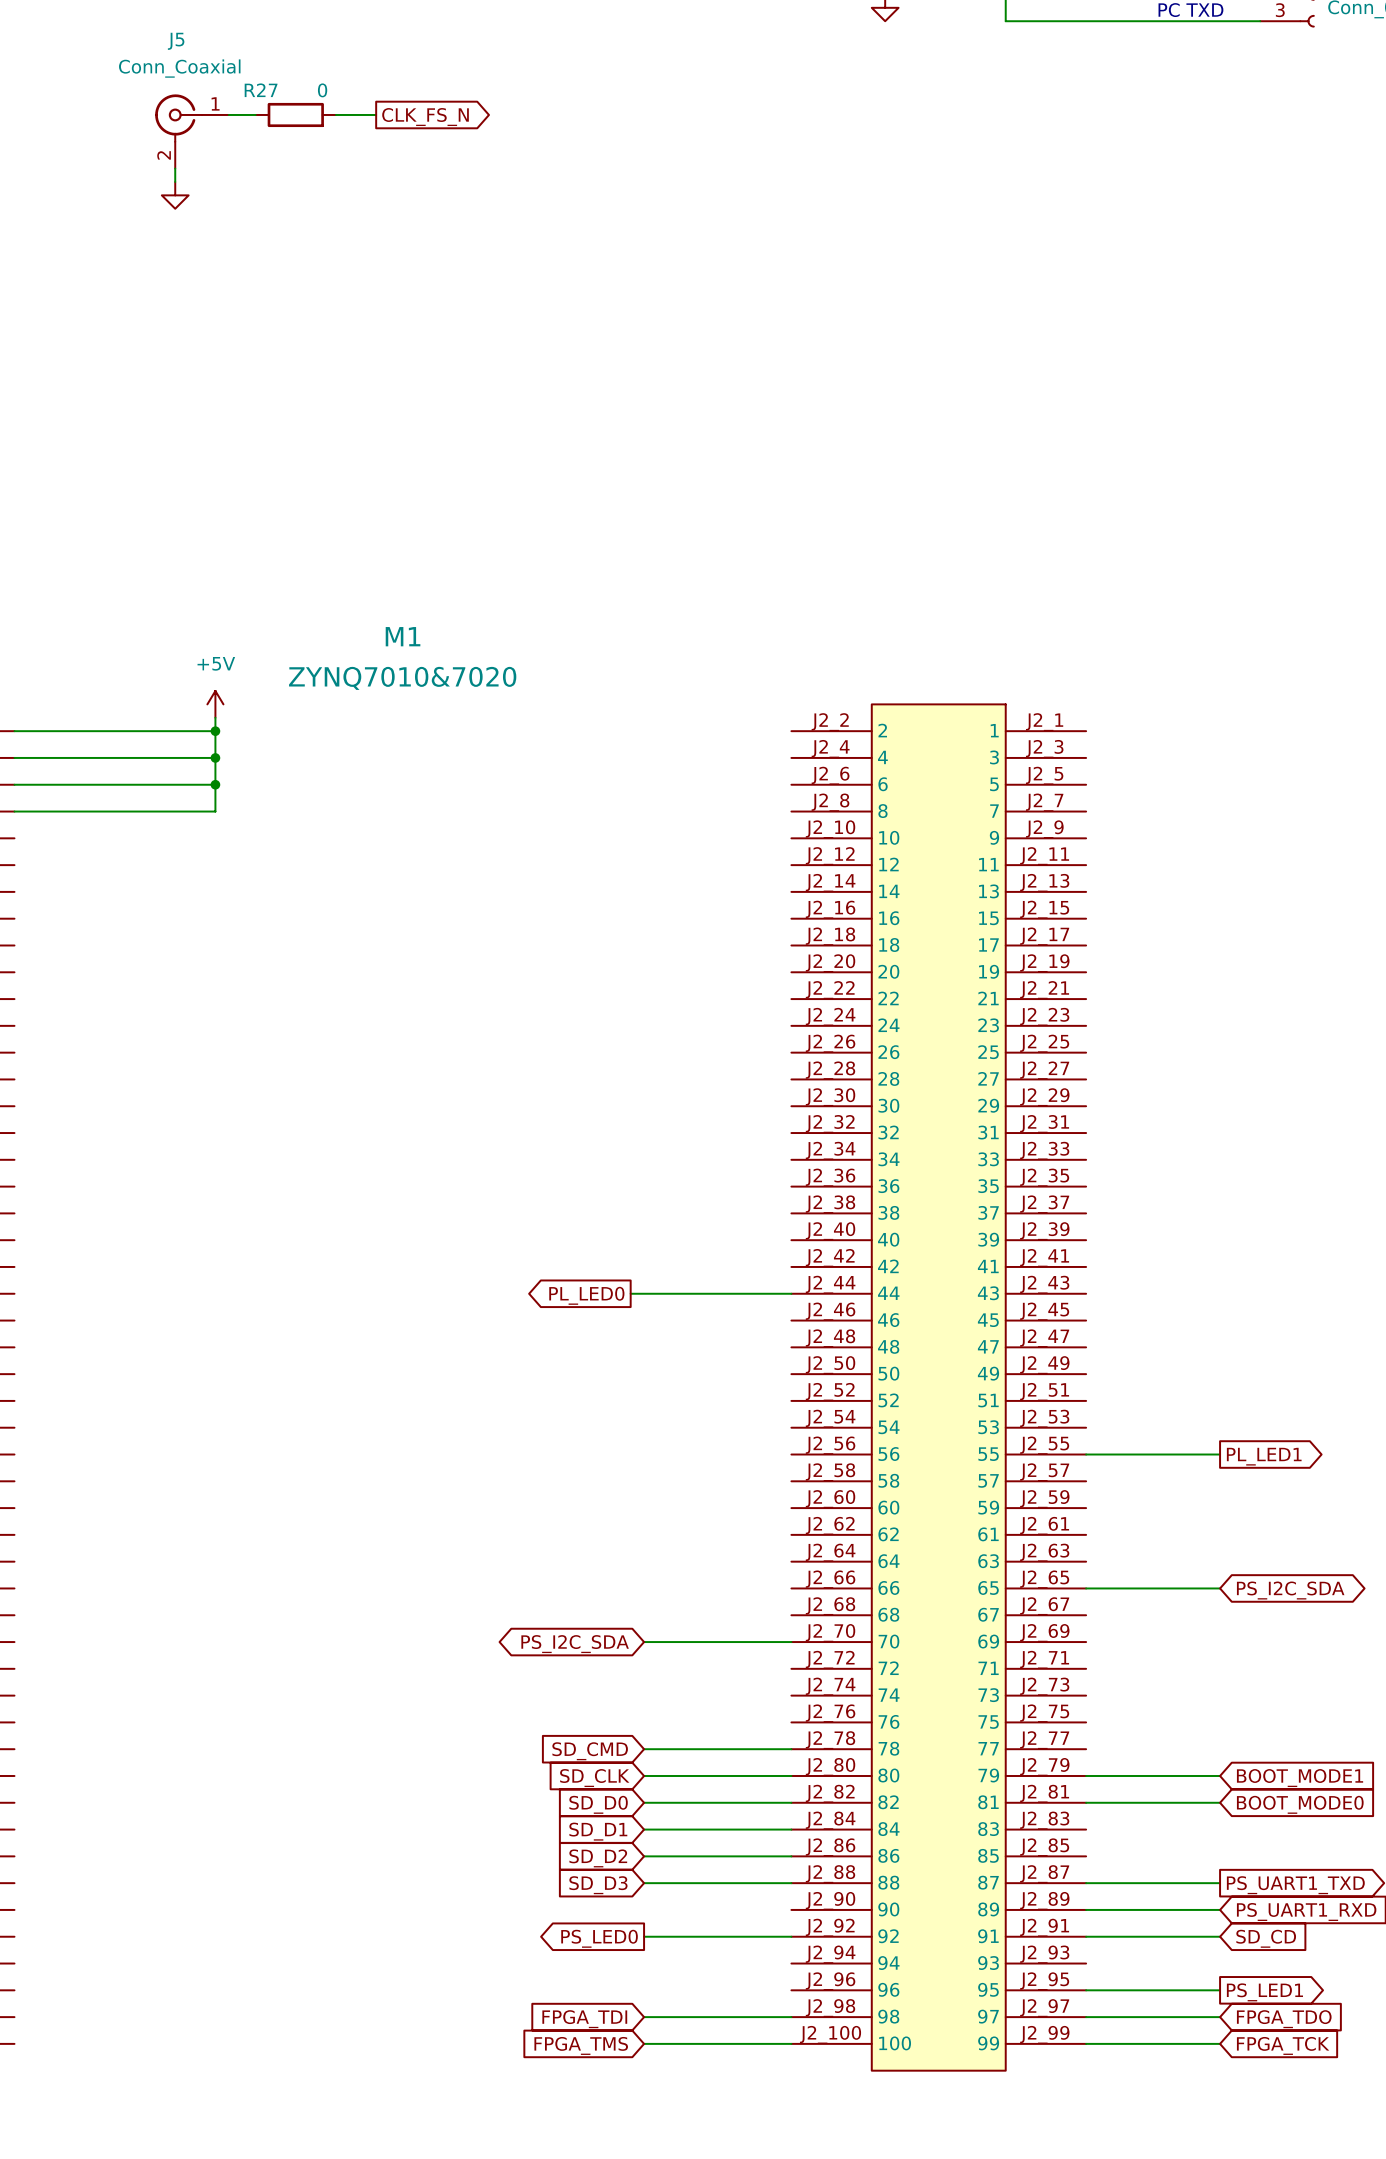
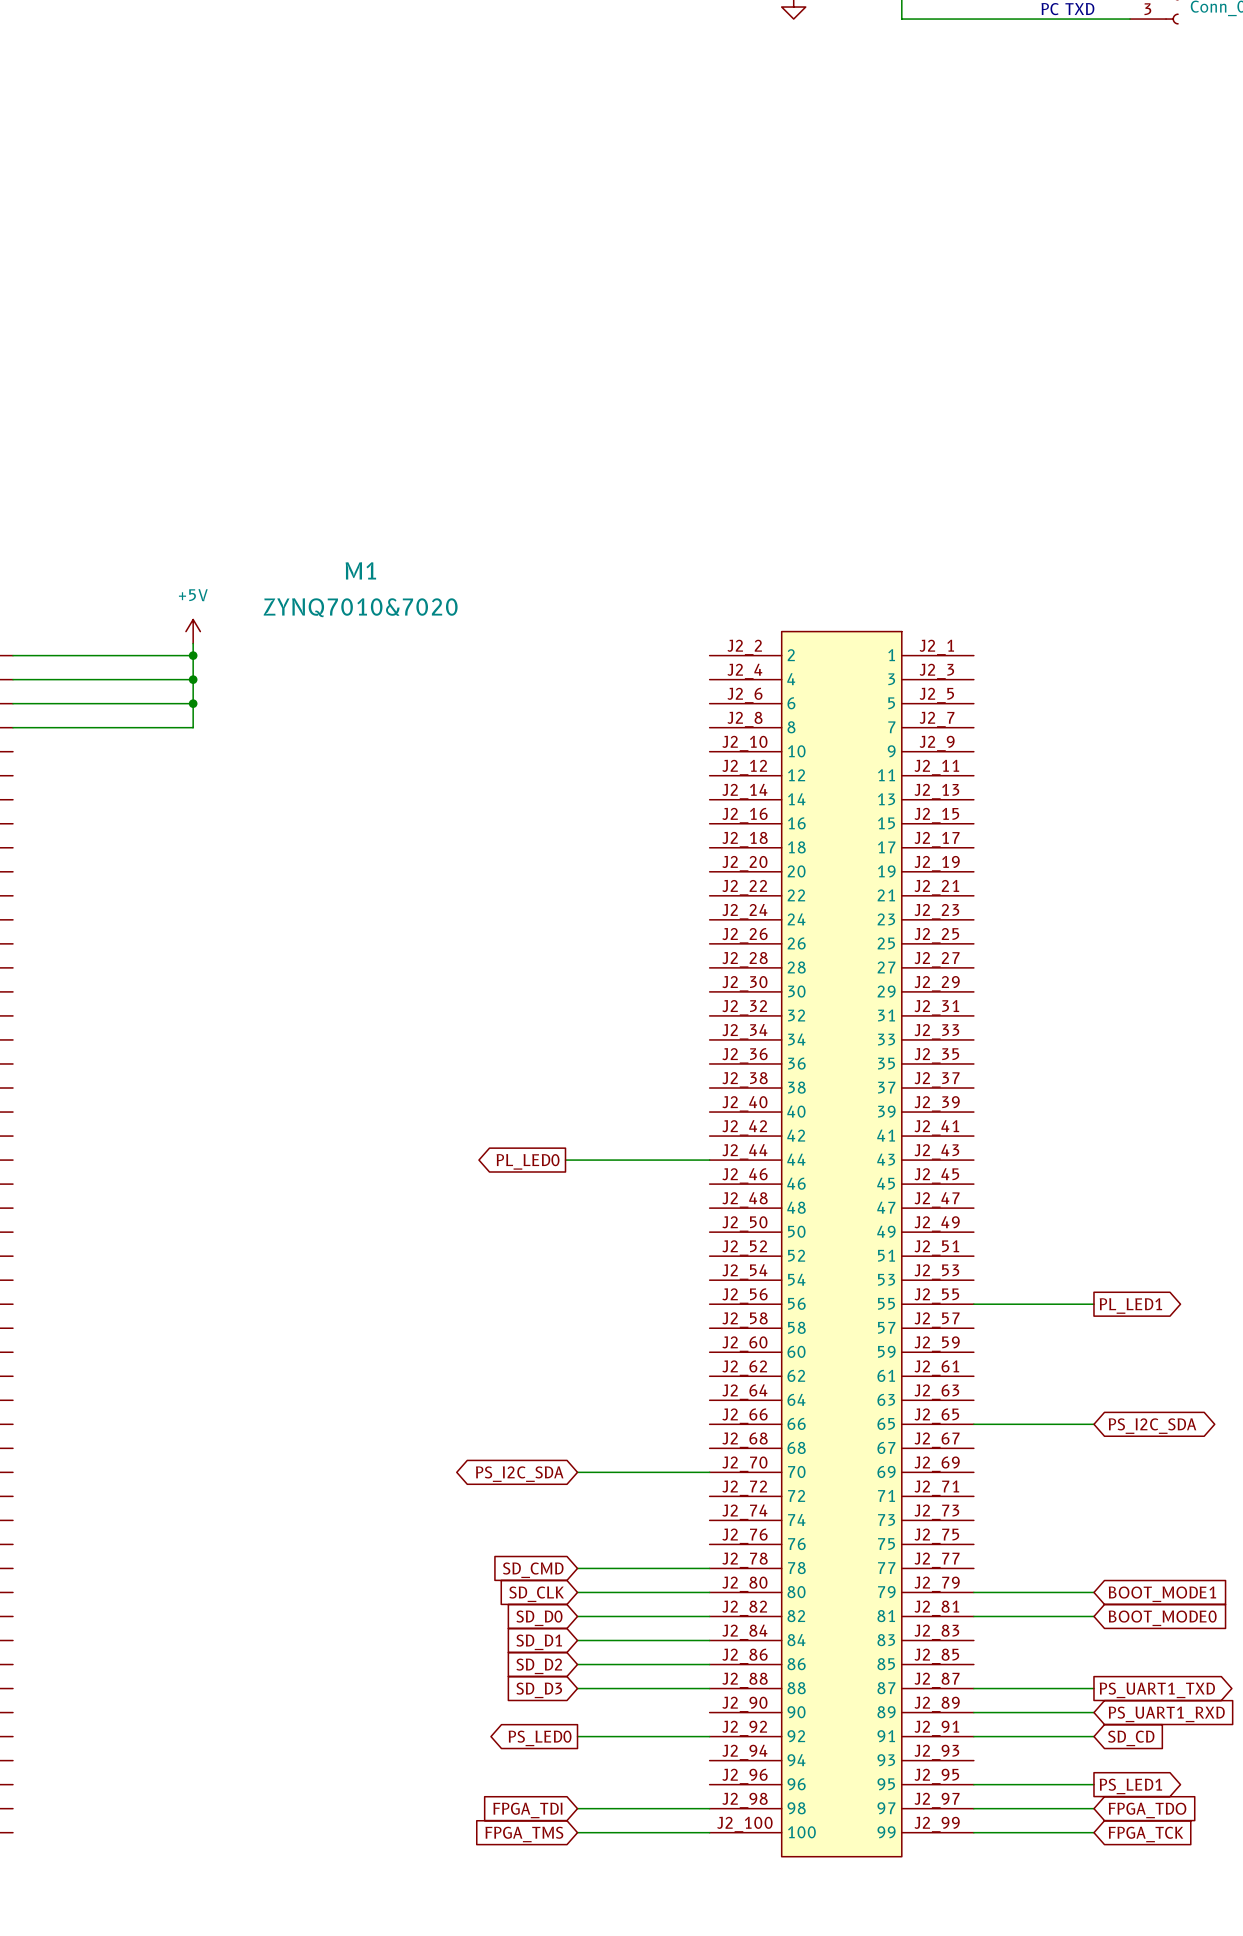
wire: (228, 114) (255, 114) -> none
R27: 0 (295, 114) -> none
wire: (335, 114) (376, 114) -> none
global label: CLK_FS_N (425, 117) -> none
J5: Conn_Coaxial (191, 131) -> none
wire: (175, 168) (175, 181) -> none
power symbol: (175, 195) -> none

